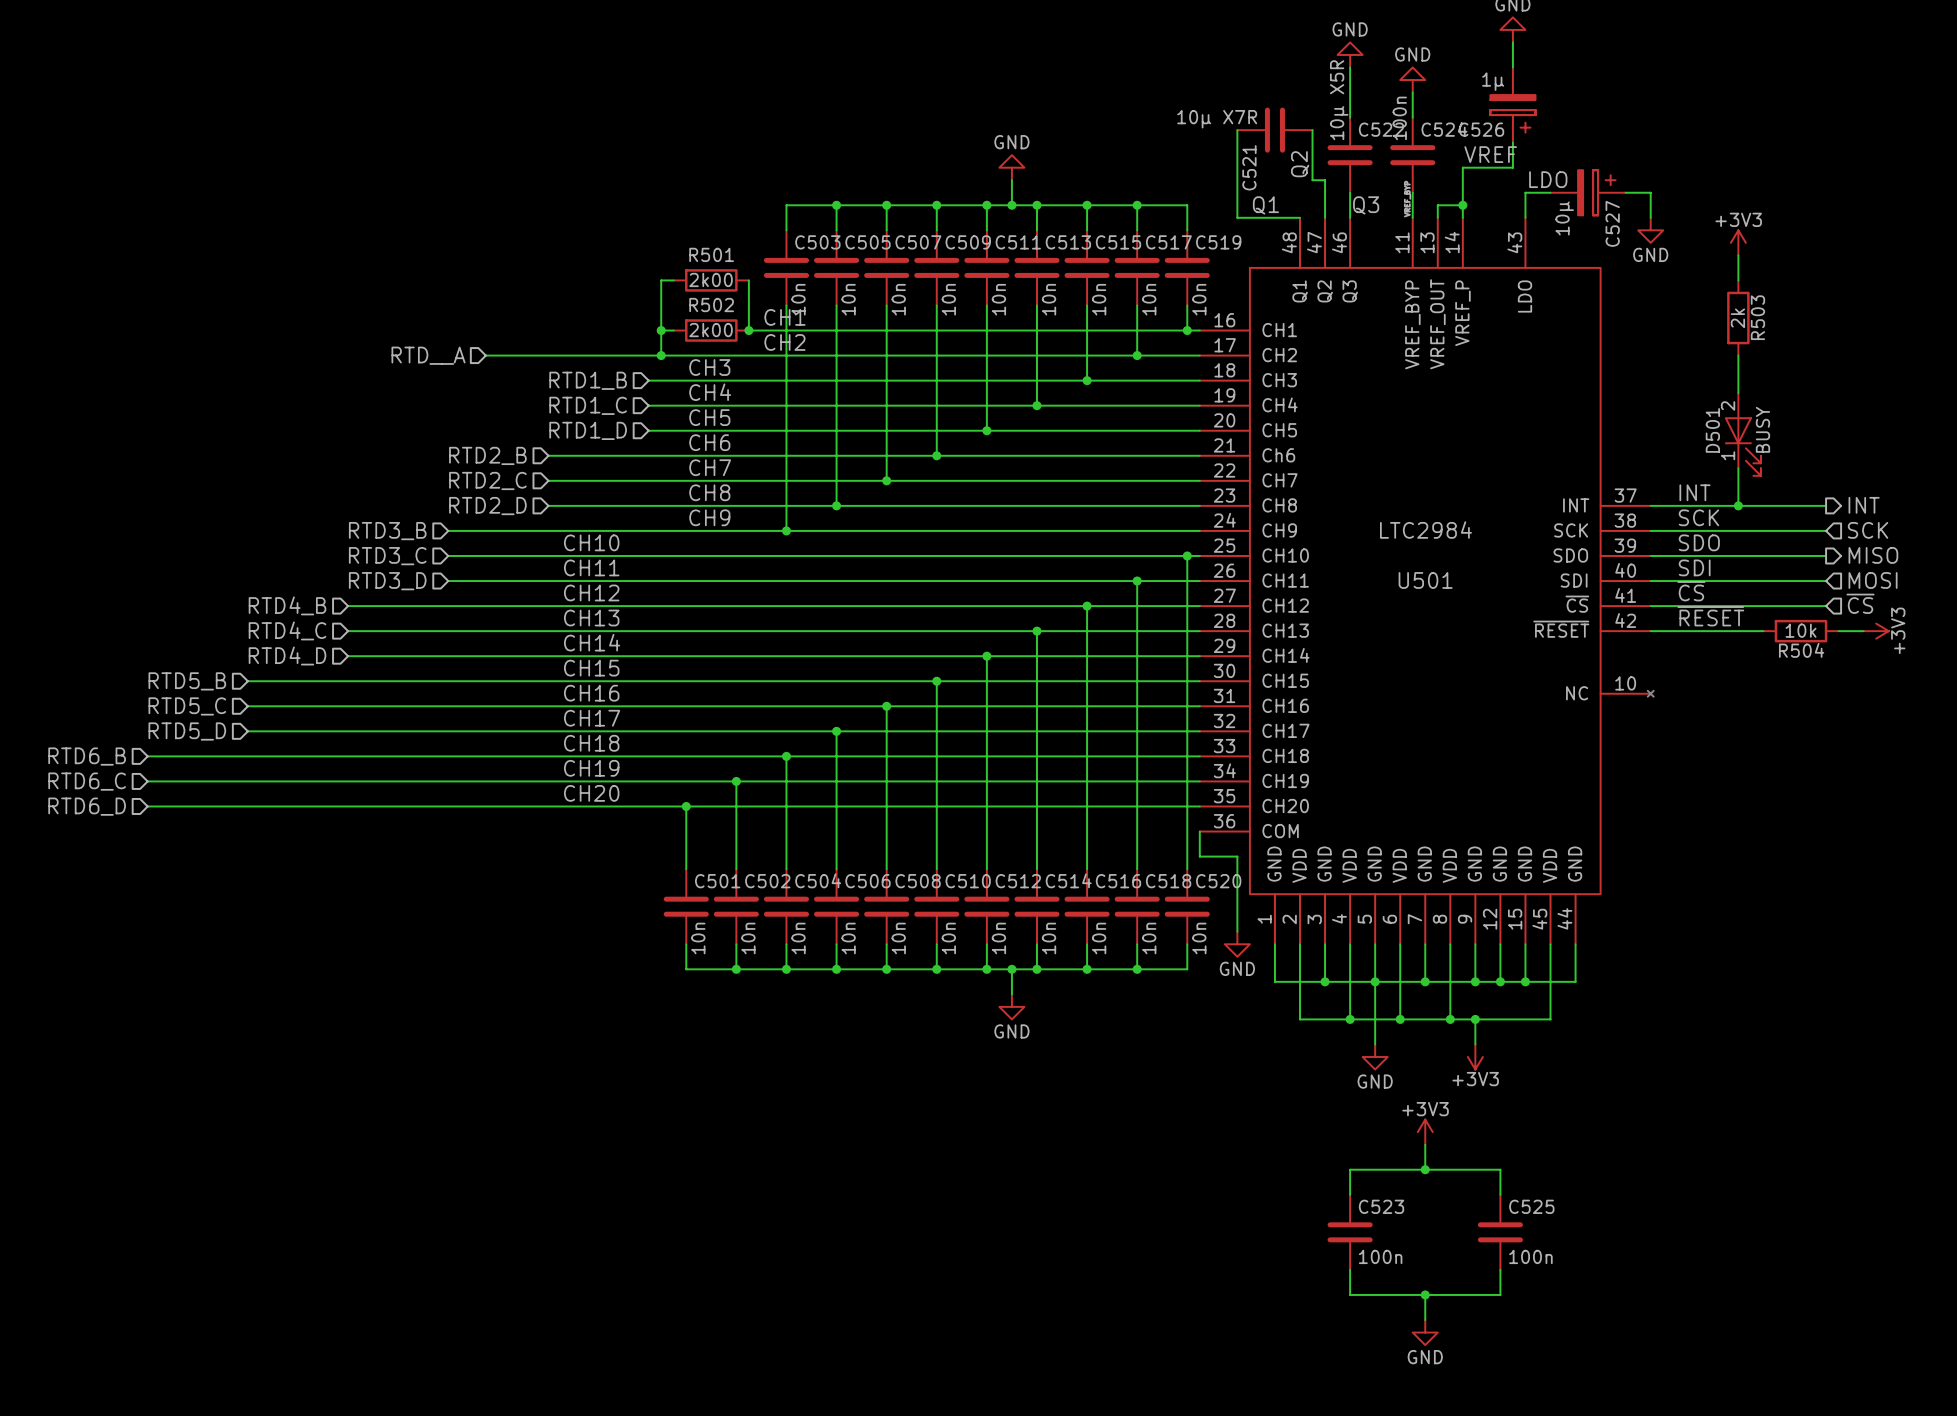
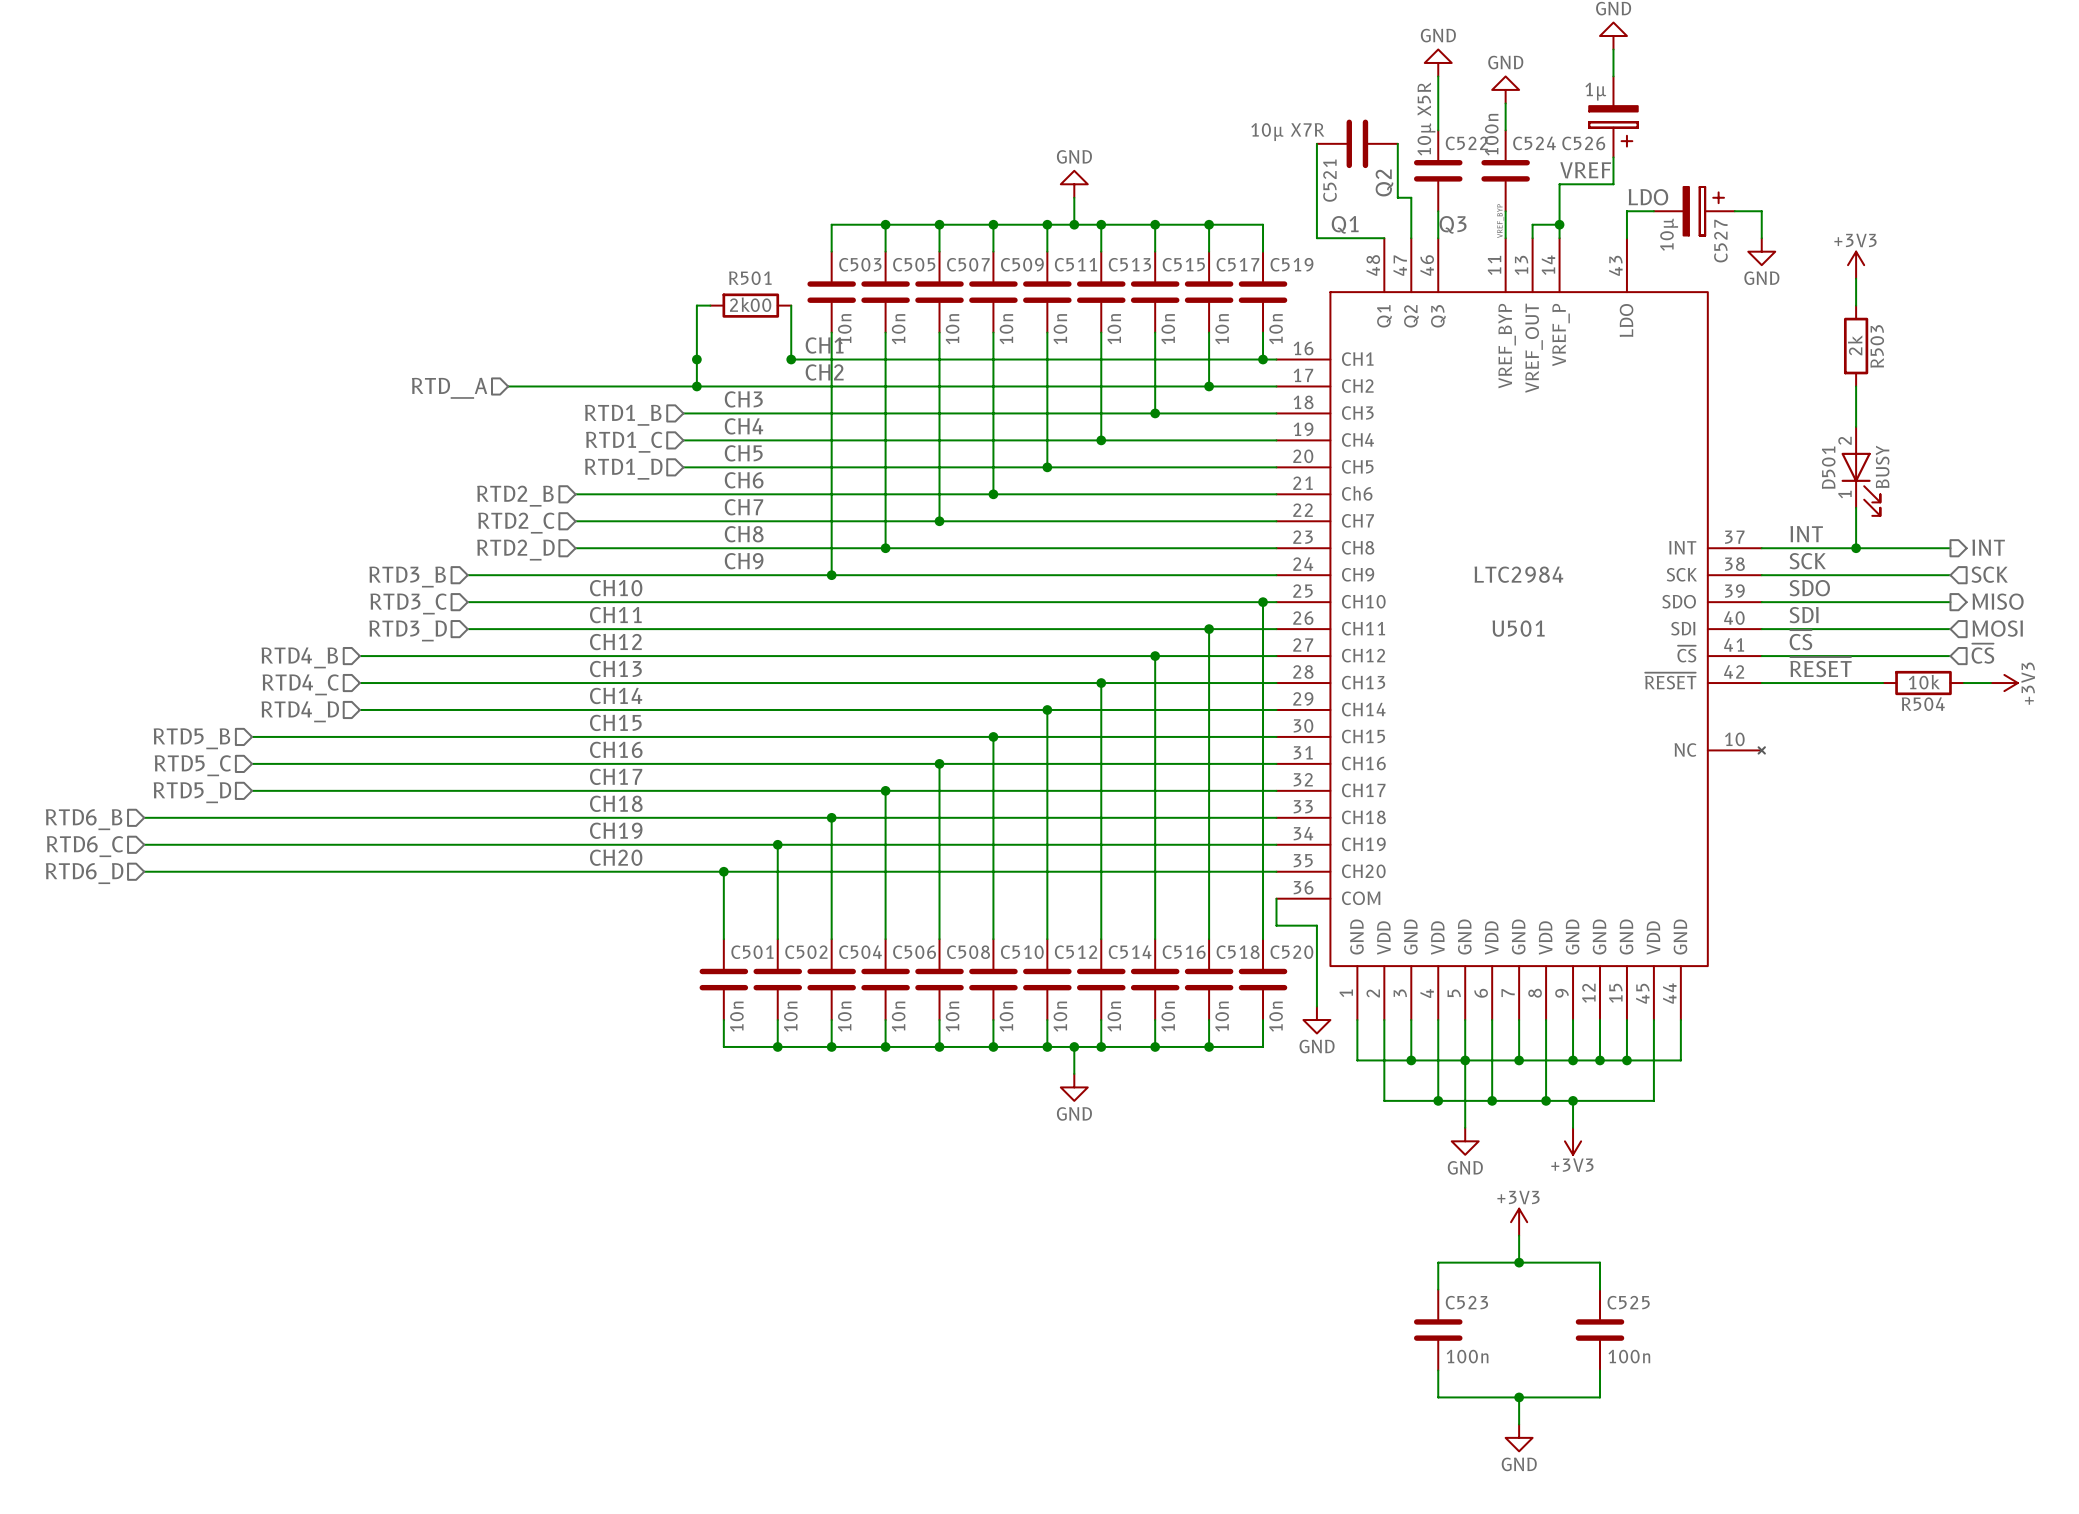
wire: (661, 330) (673, 330) -> none
R502: 2k00 (711, 330) -> none

